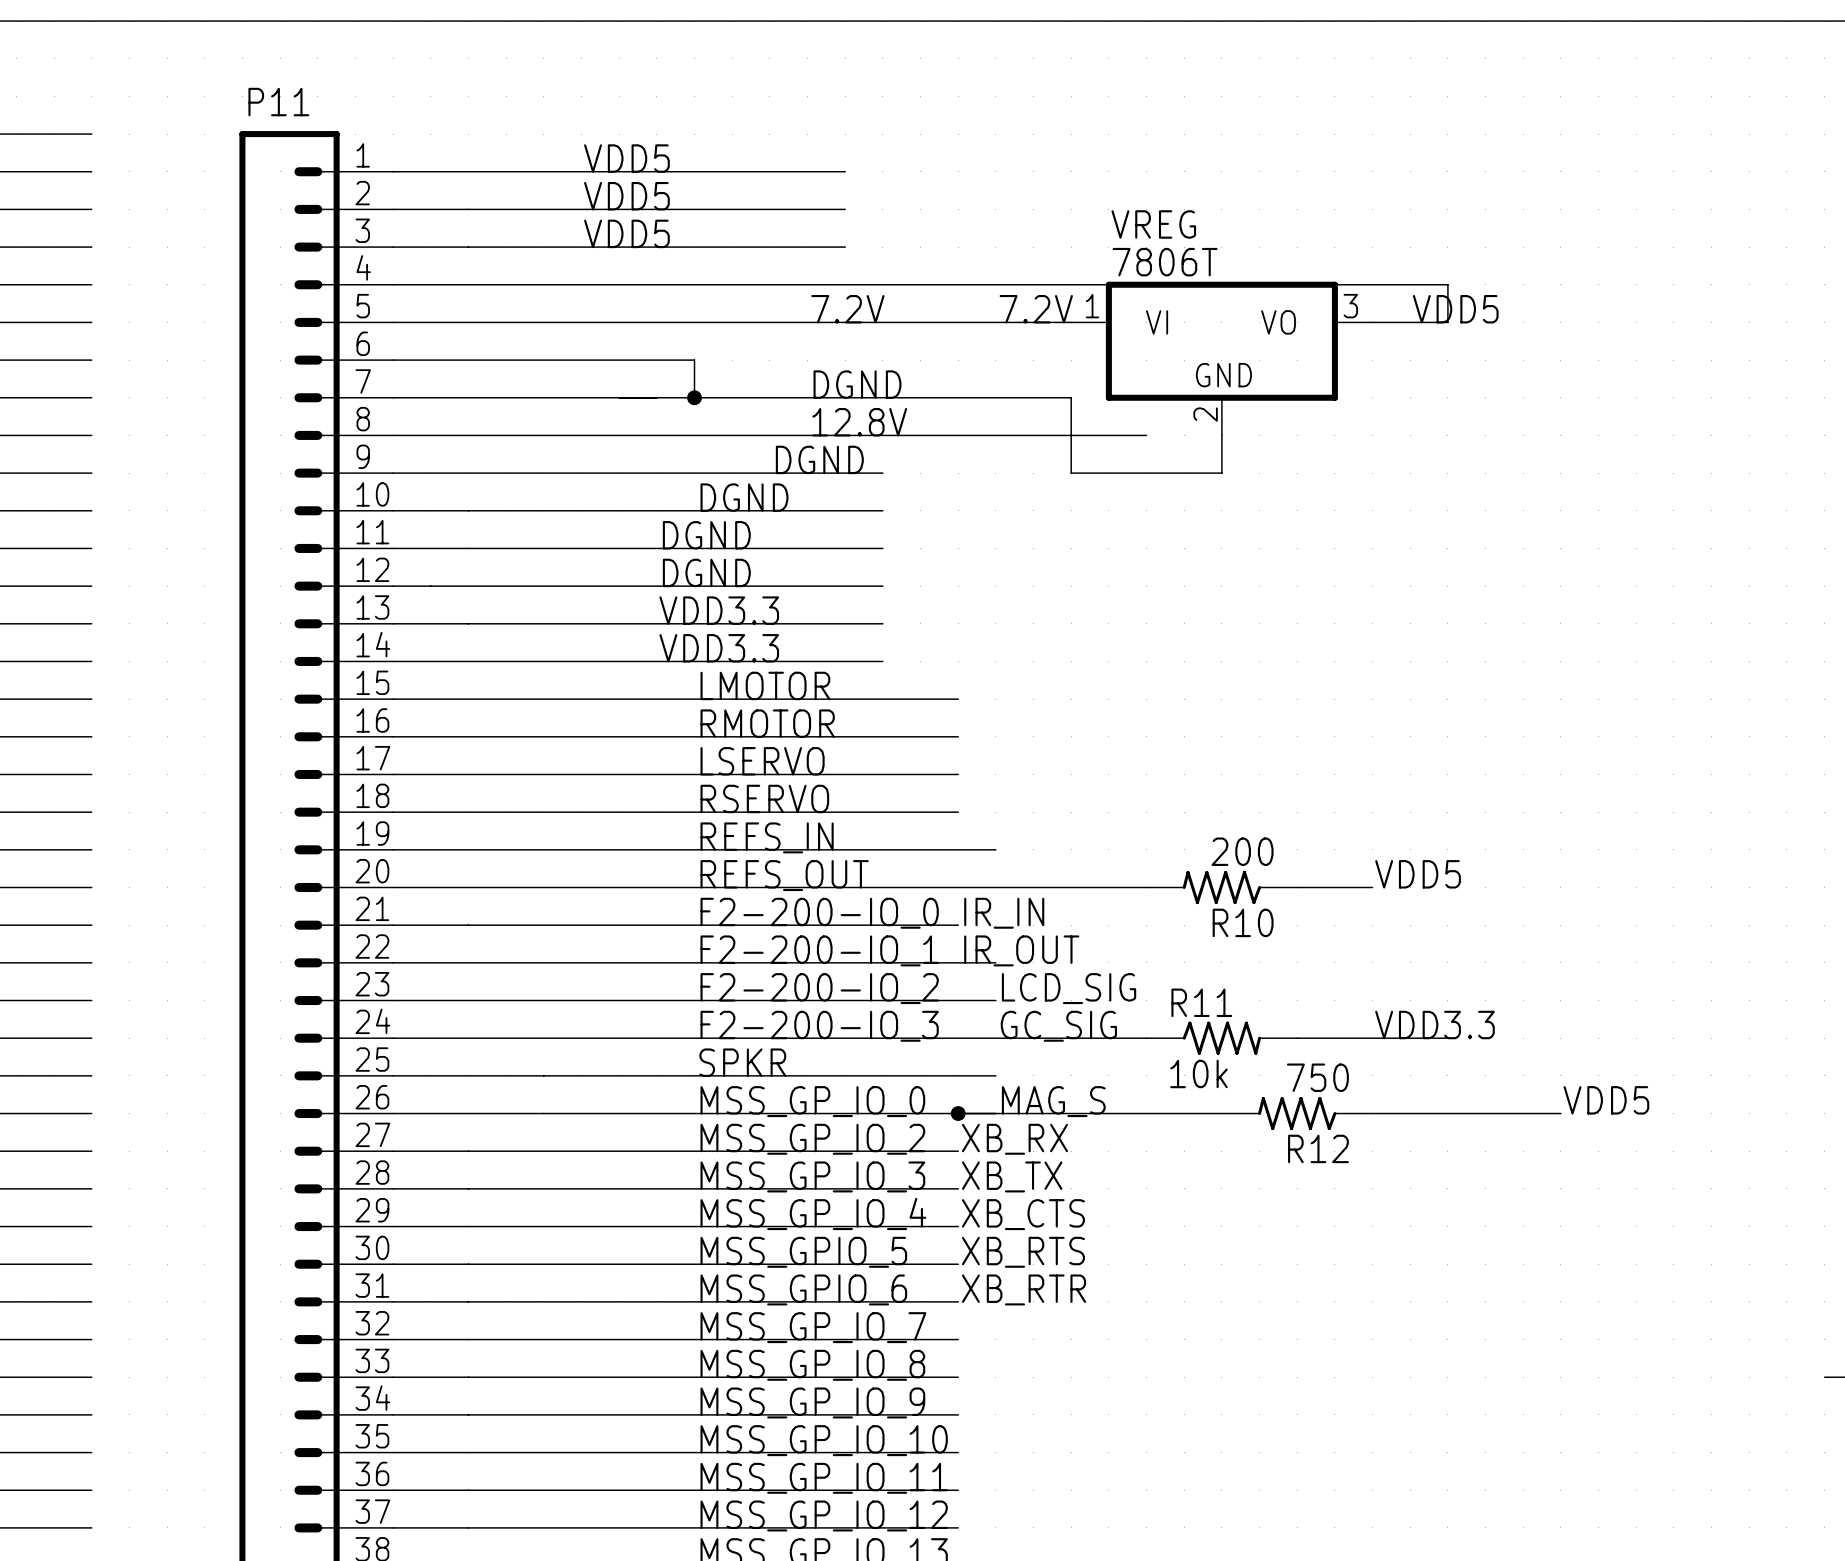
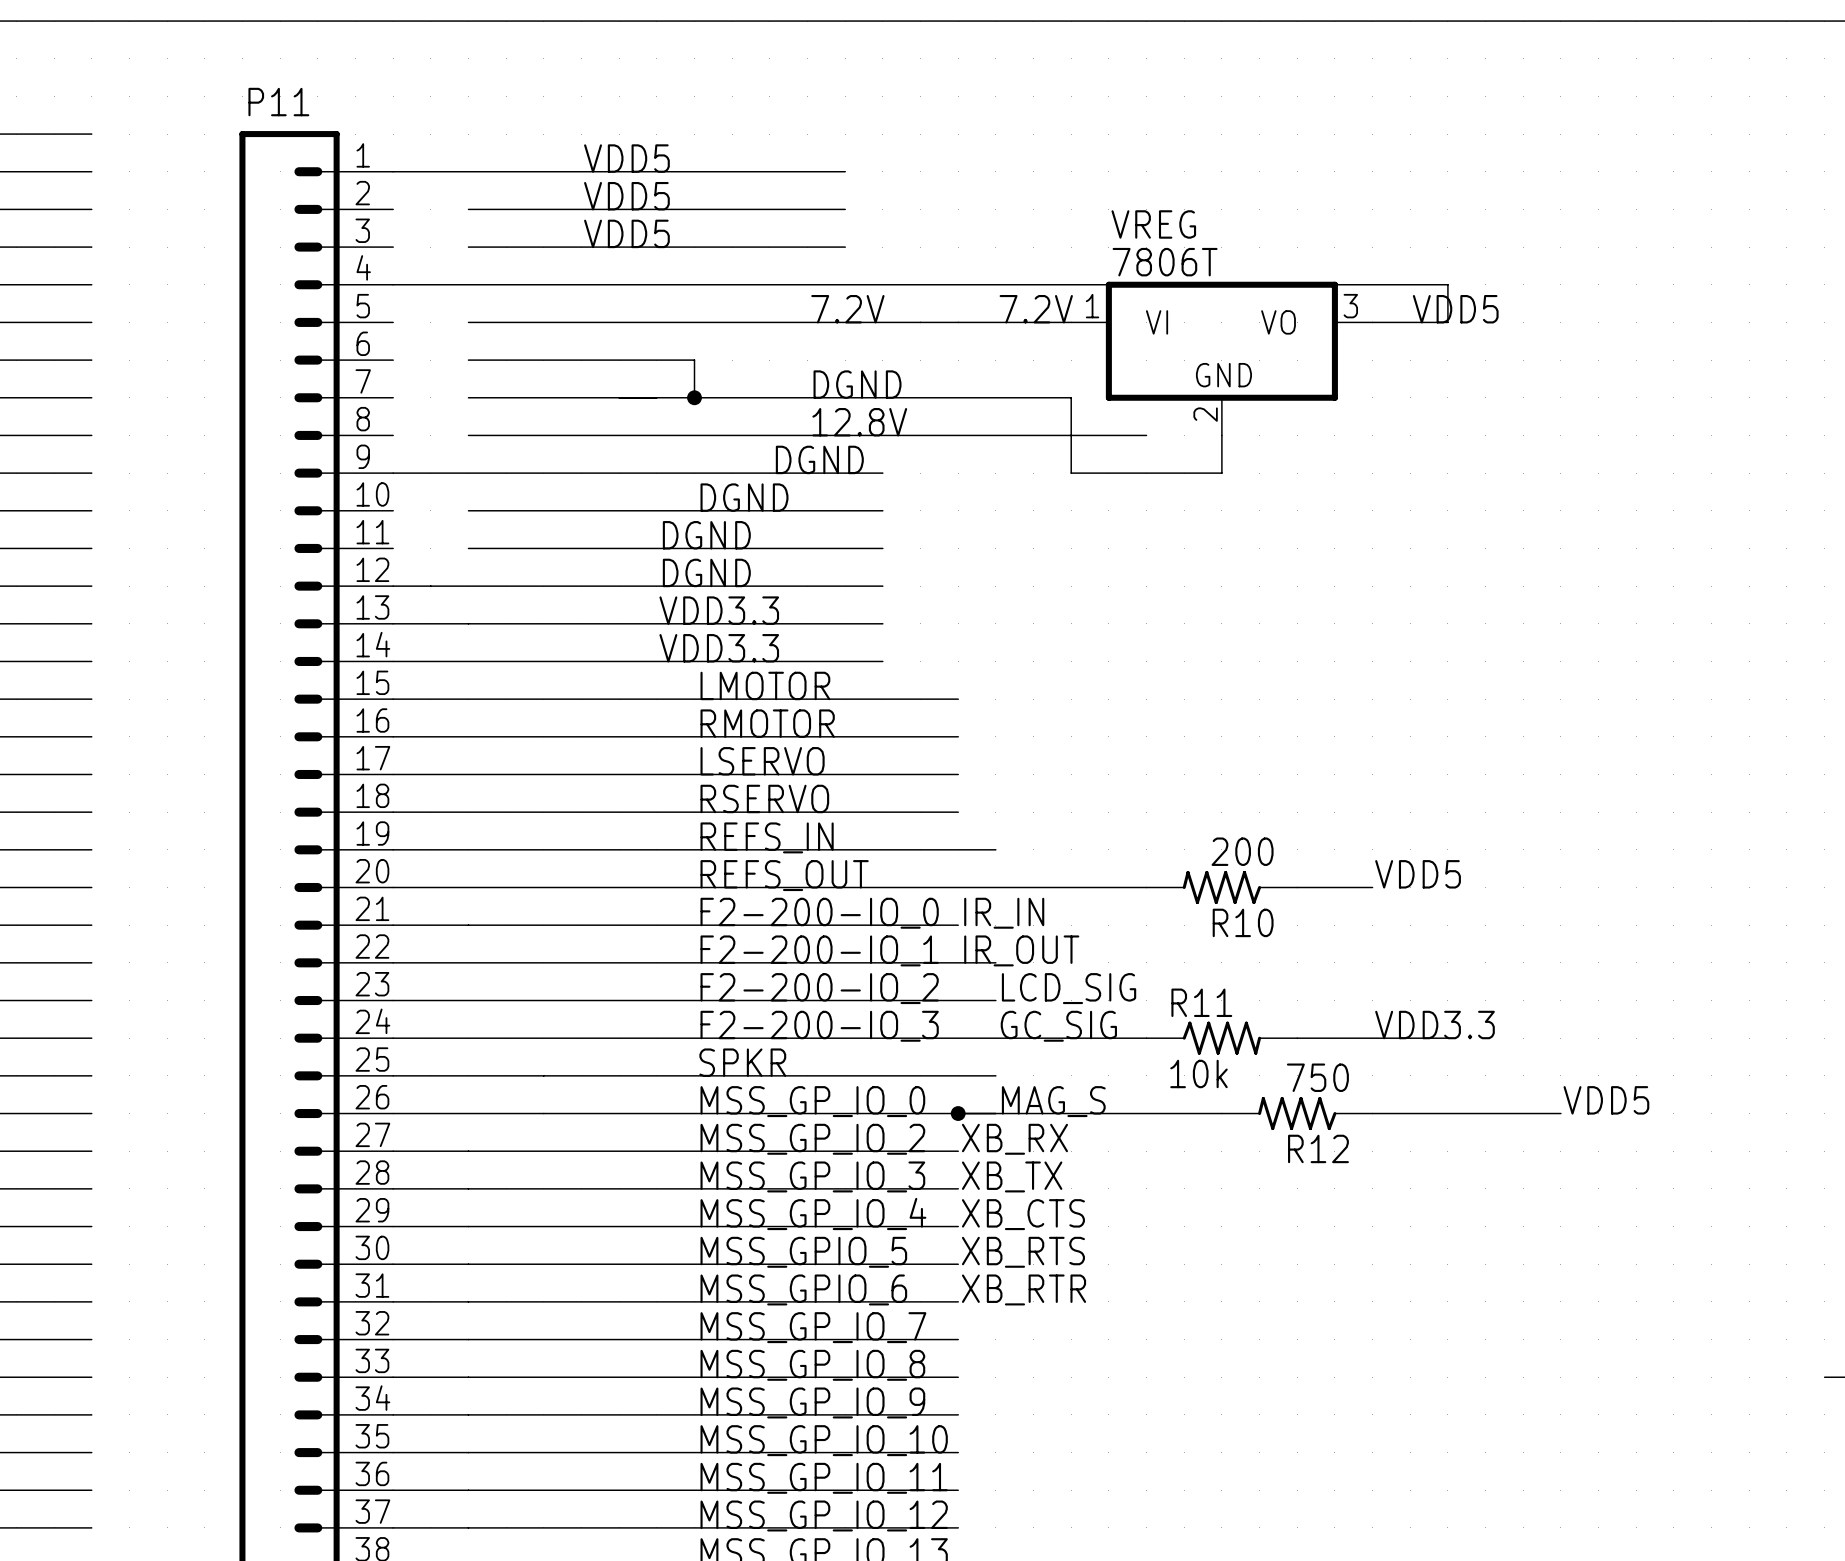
wire: (393, 209) (468, 209) -> none
wire: (393, 247) (468, 247) -> none
wire: (393, 322) (468, 322) -> none
wire: (393, 360) (468, 360) -> none
wire: (393, 397) (468, 397) -> none
wire: (393, 435) (468, 435) -> none
wire: (393, 510) (468, 510) -> none
wire: (393, 548) (468, 548) -> none

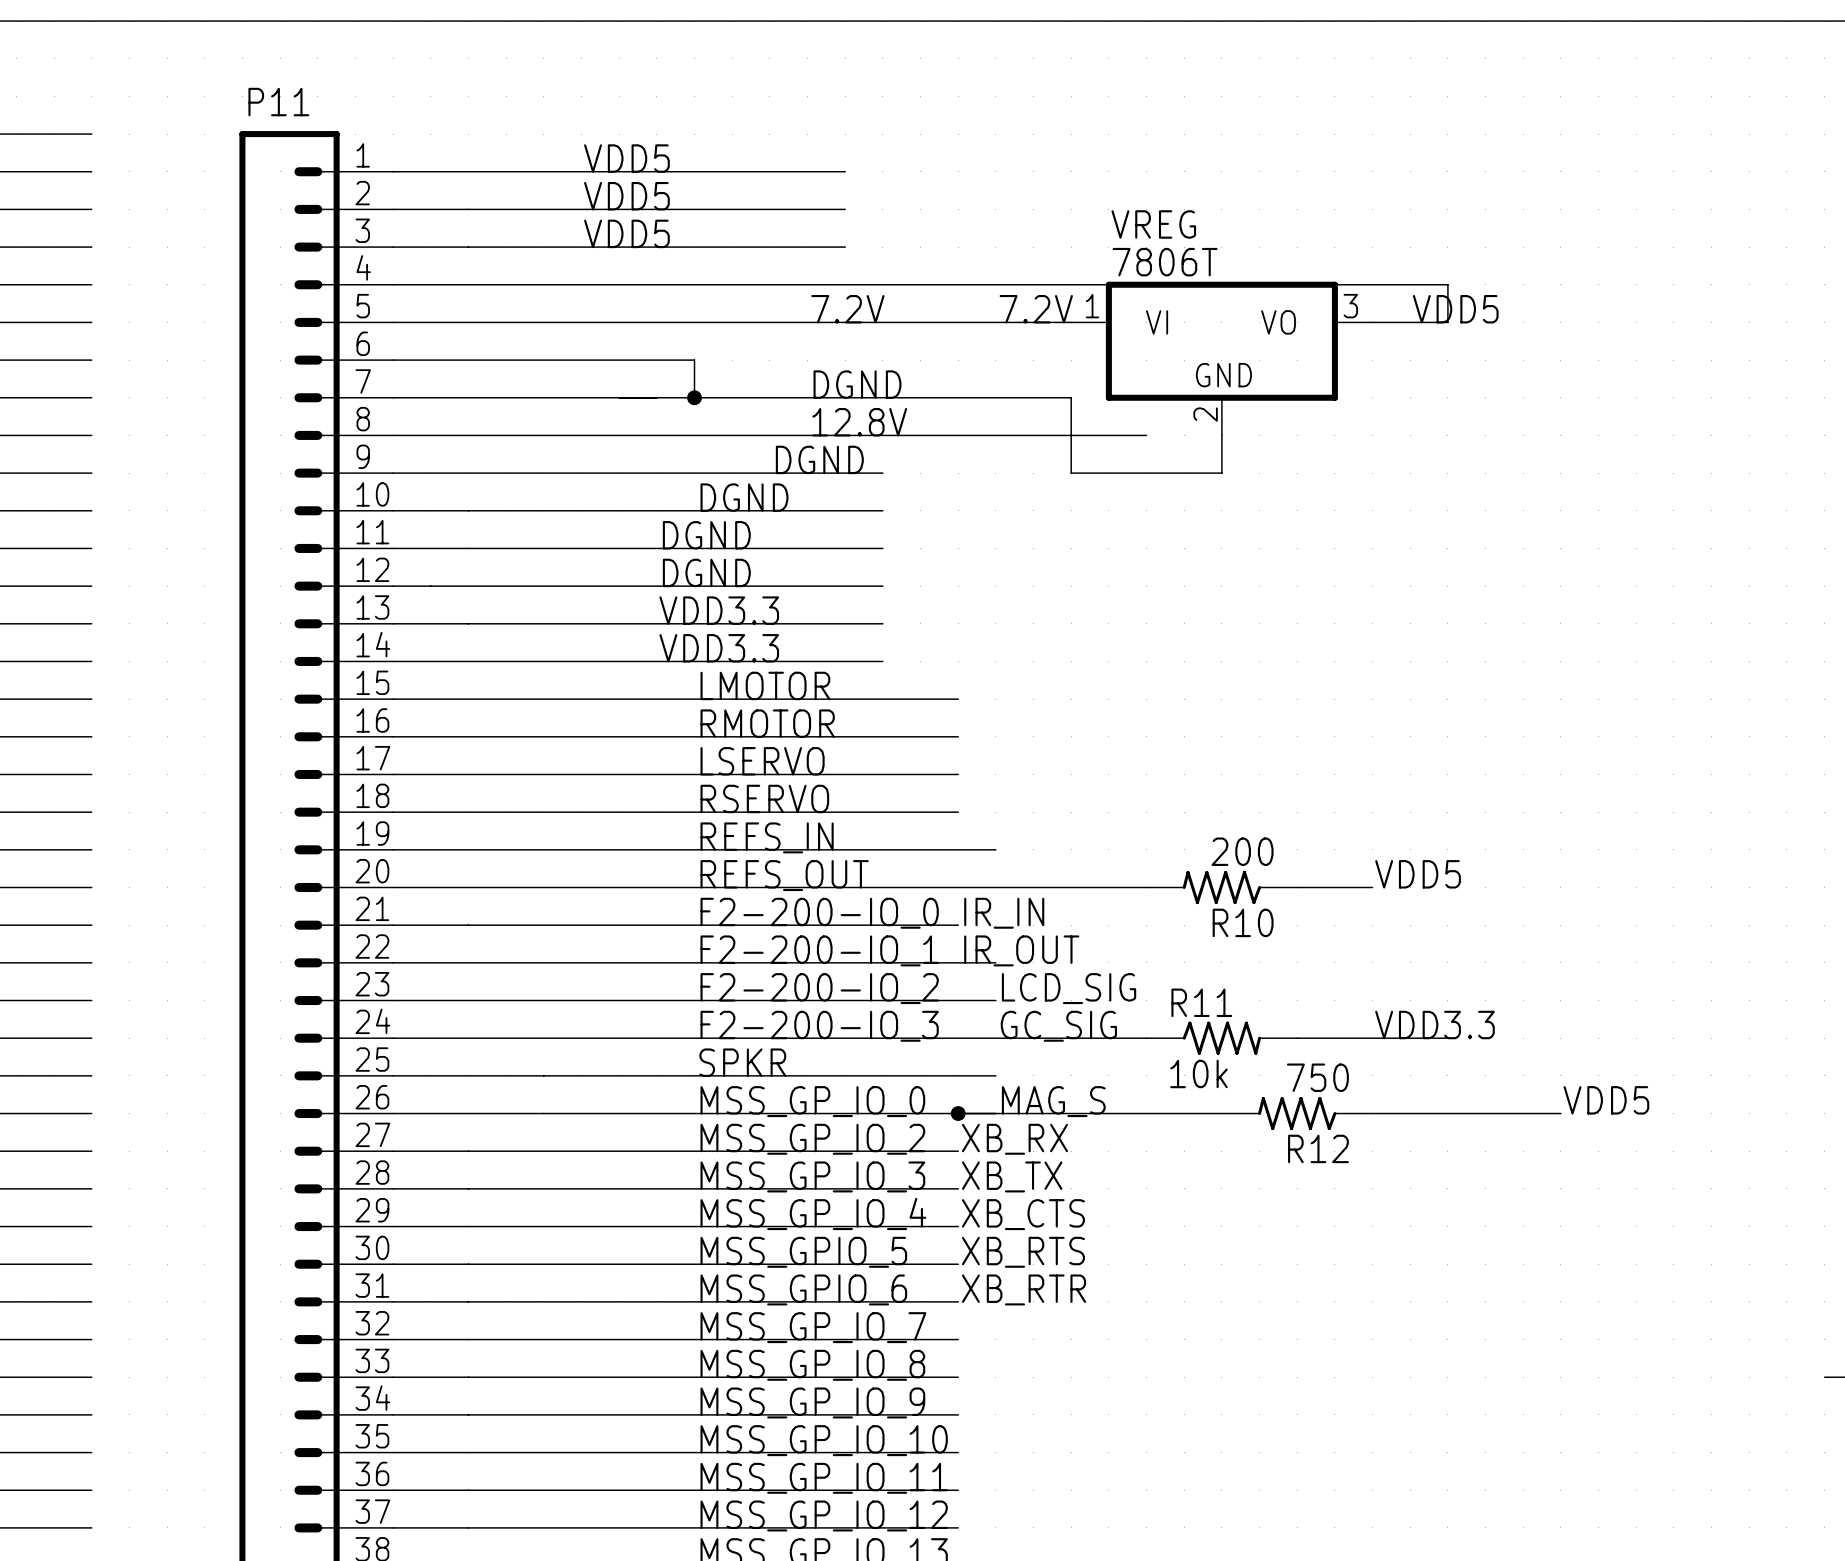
wire: none -> (393, 209) (468, 209)
wire: none -> (393, 247) (468, 247)
wire: none -> (393, 322) (468, 322)
wire: none -> (393, 360) (468, 360)
wire: none -> (393, 397) (468, 397)
wire: none -> (393, 435) (468, 435)
wire: none -> (393, 510) (468, 510)
wire: none -> (393, 548) (468, 548)

